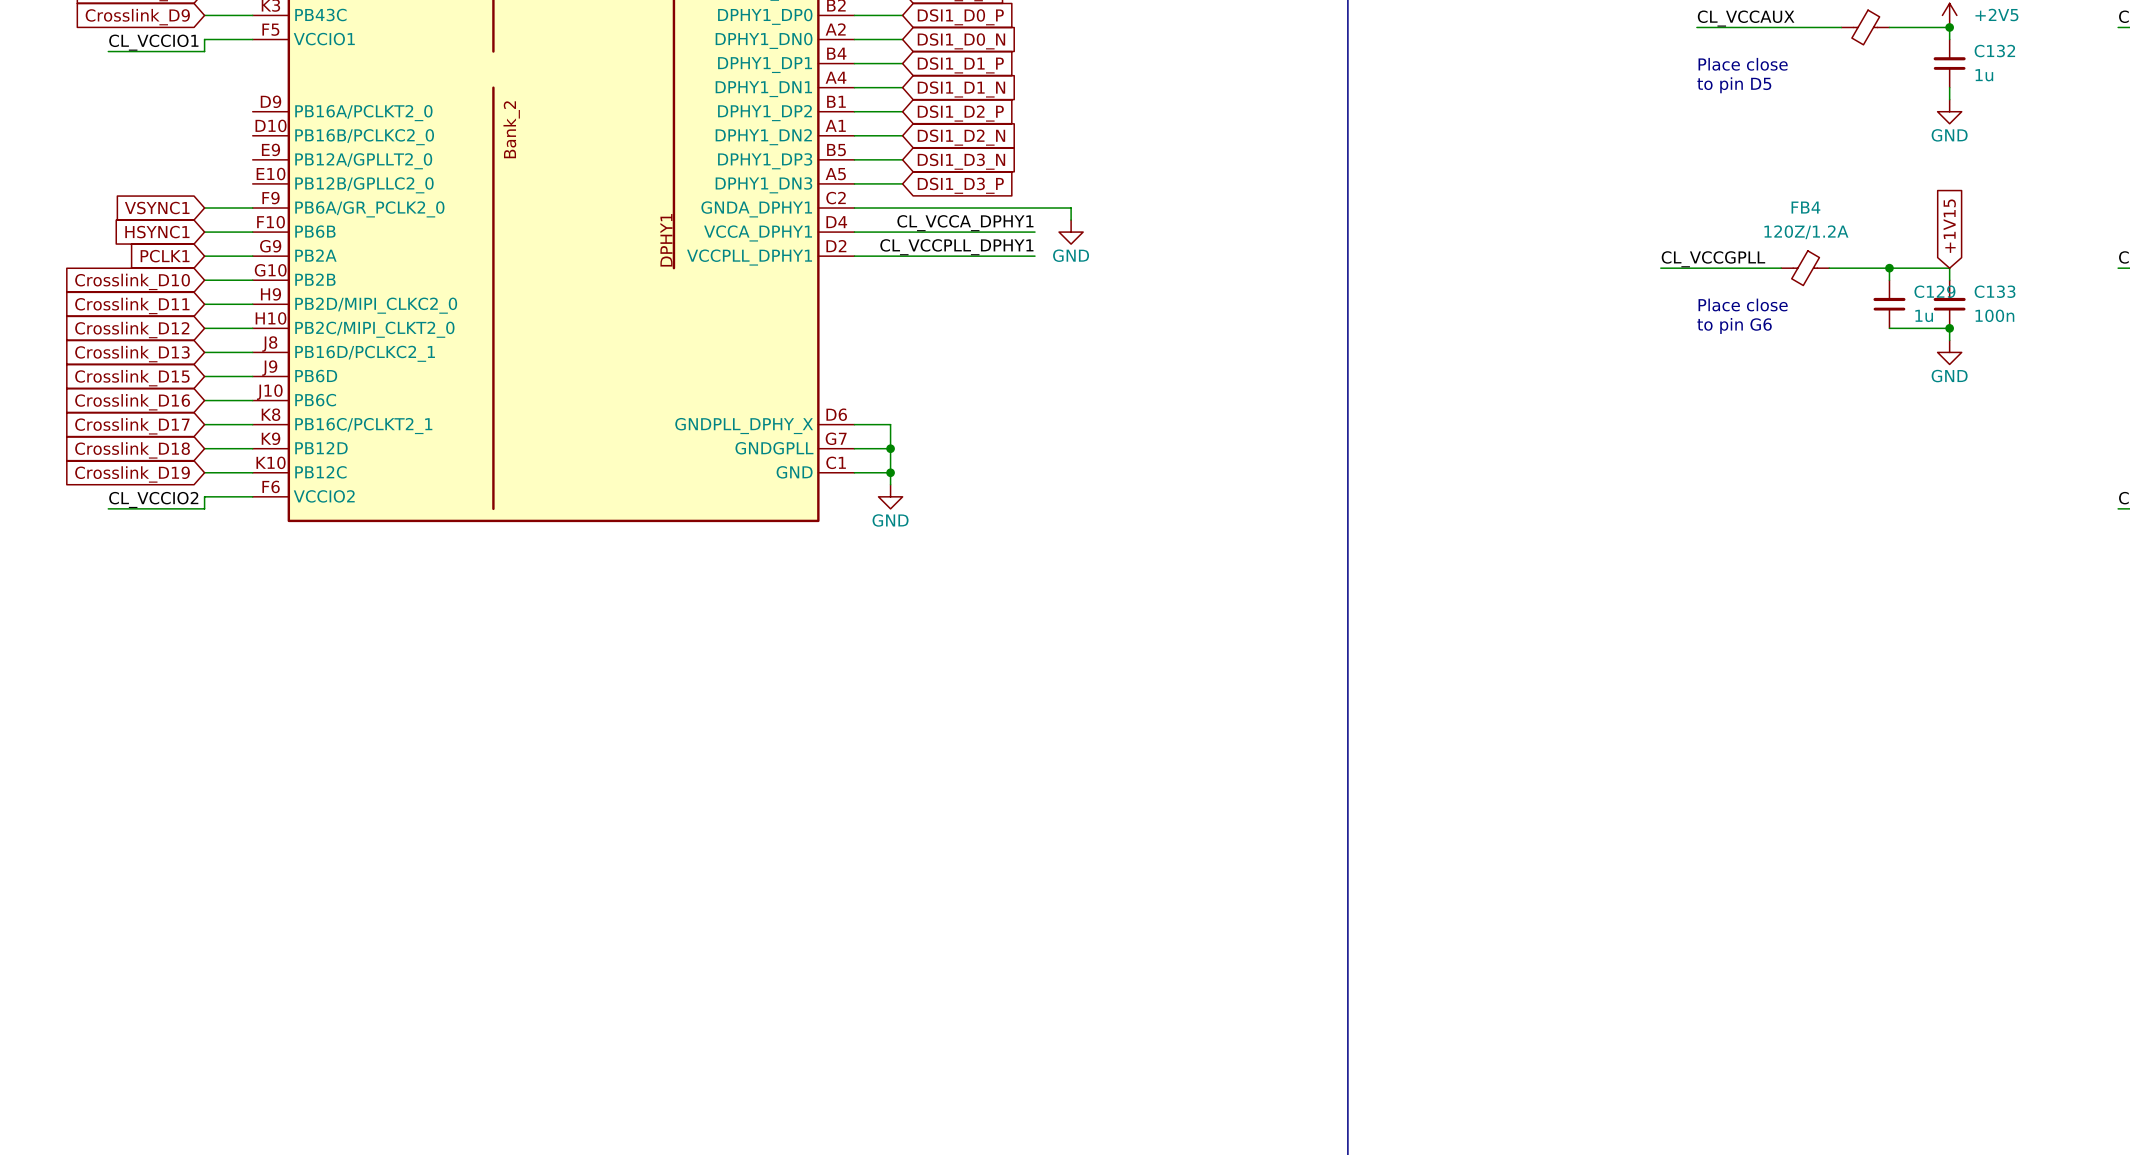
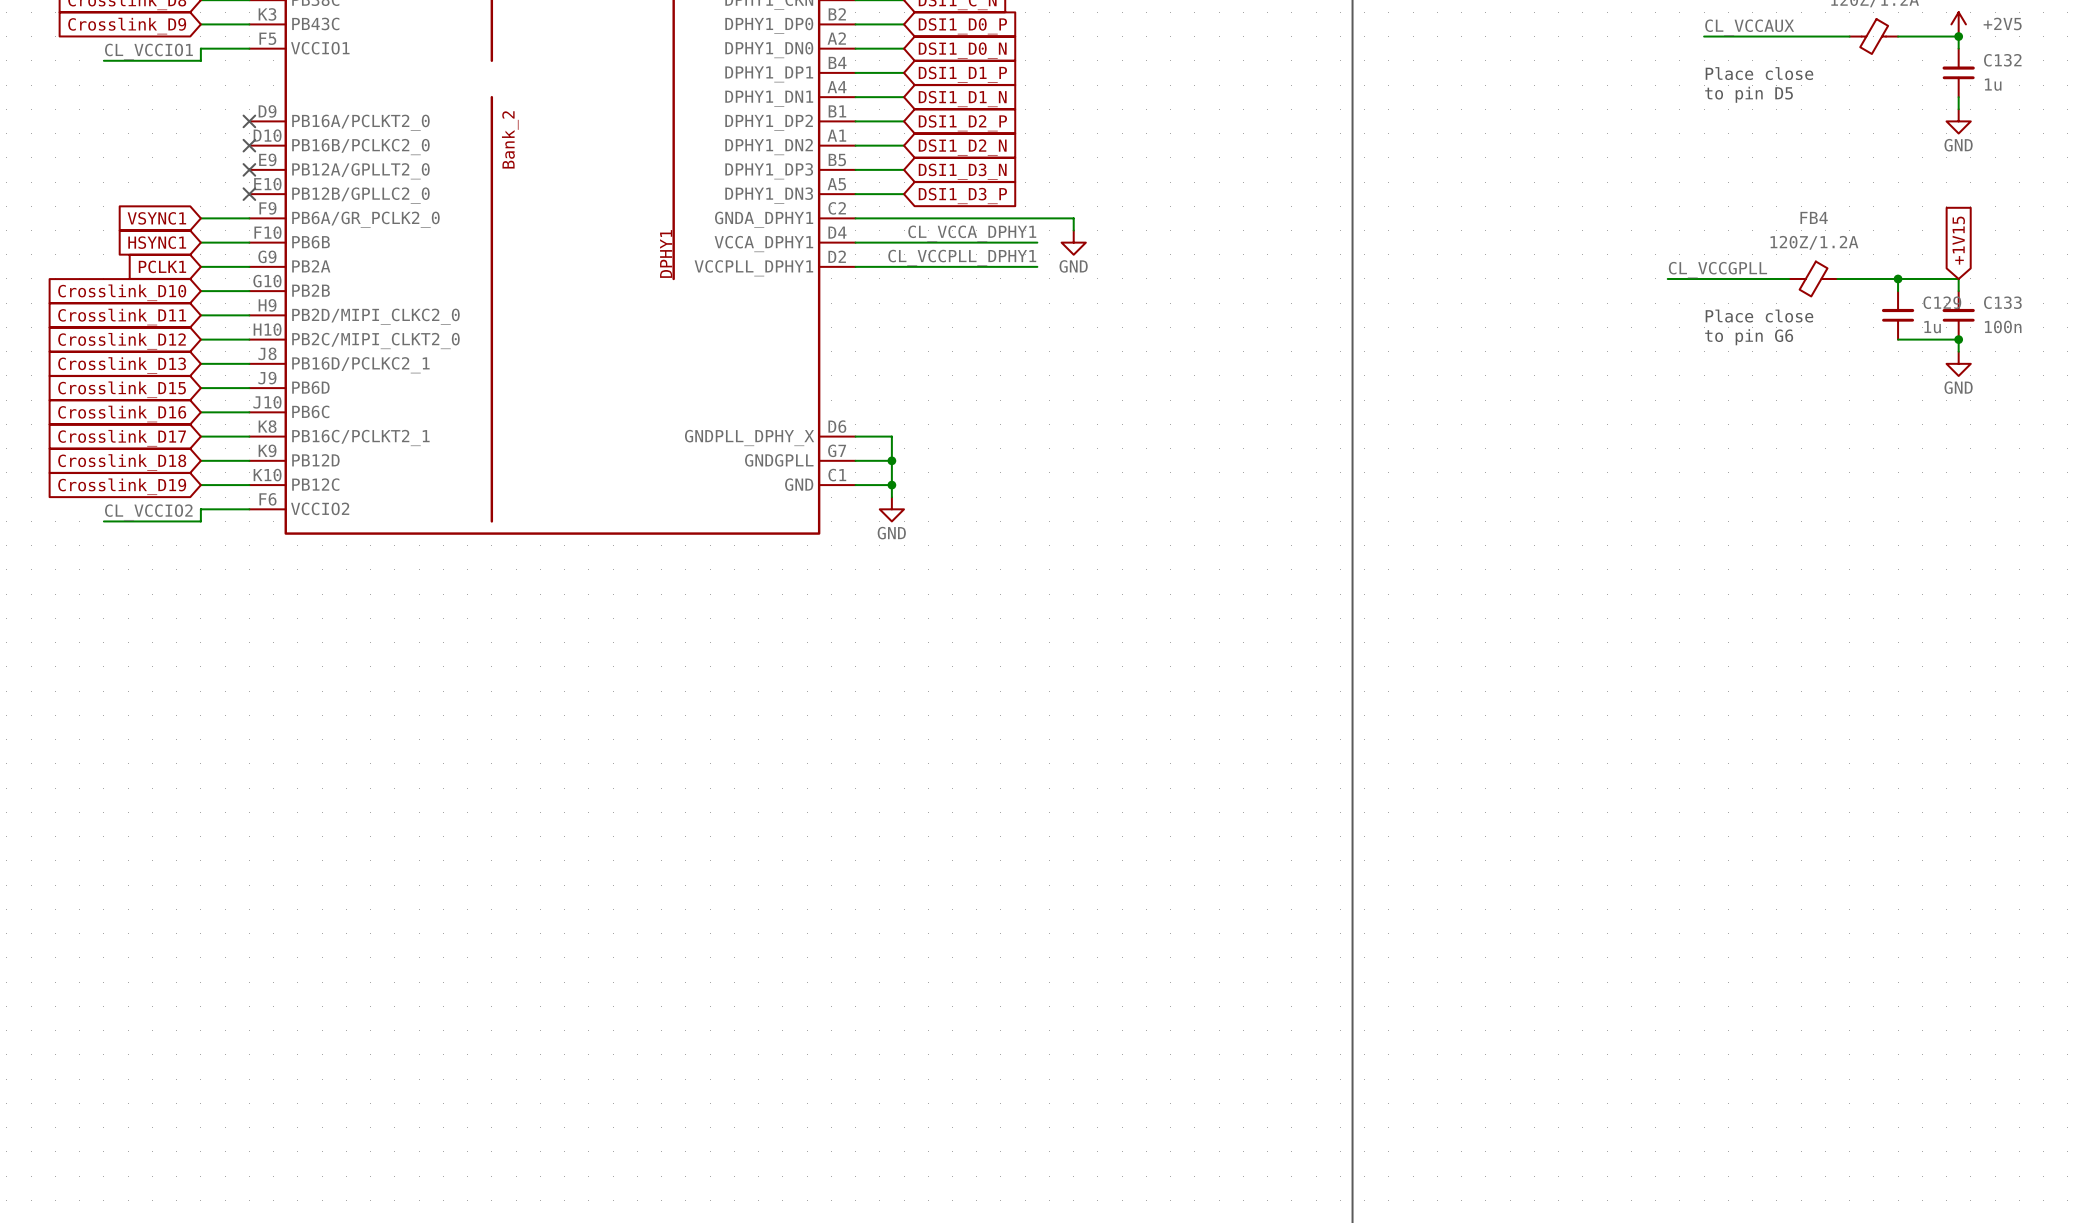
no-connect mark: none -> (249, 121)
no-connect mark: none -> (249, 145)
no-connect mark: none -> (249, 169)
no-connect mark: none -> (249, 194)

